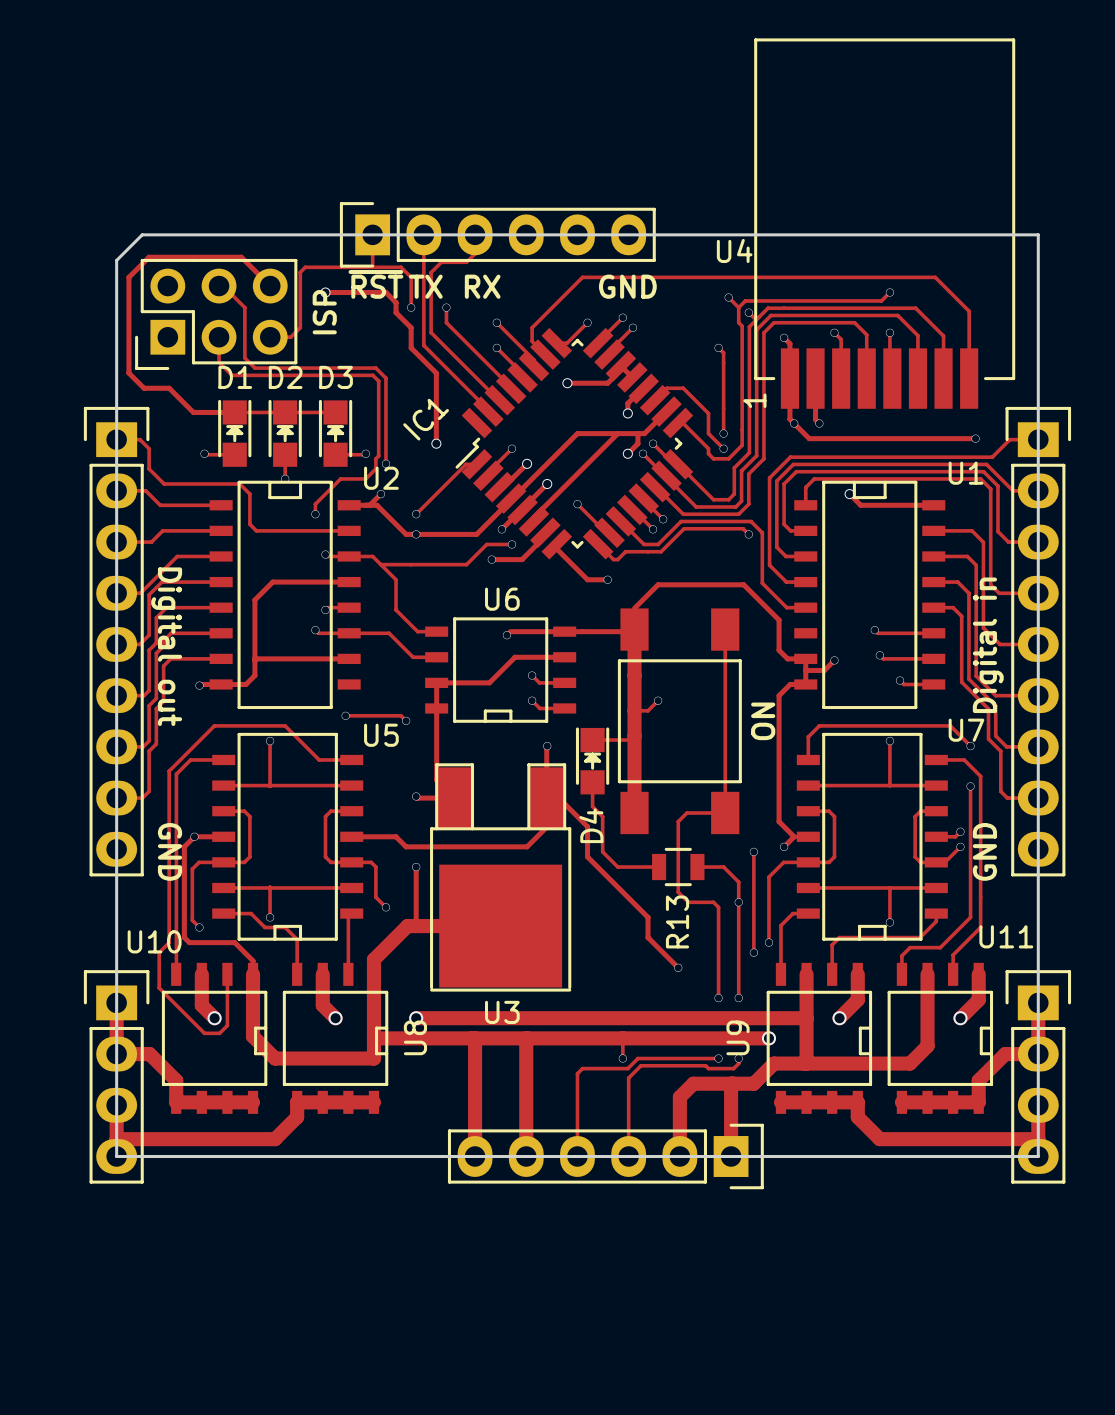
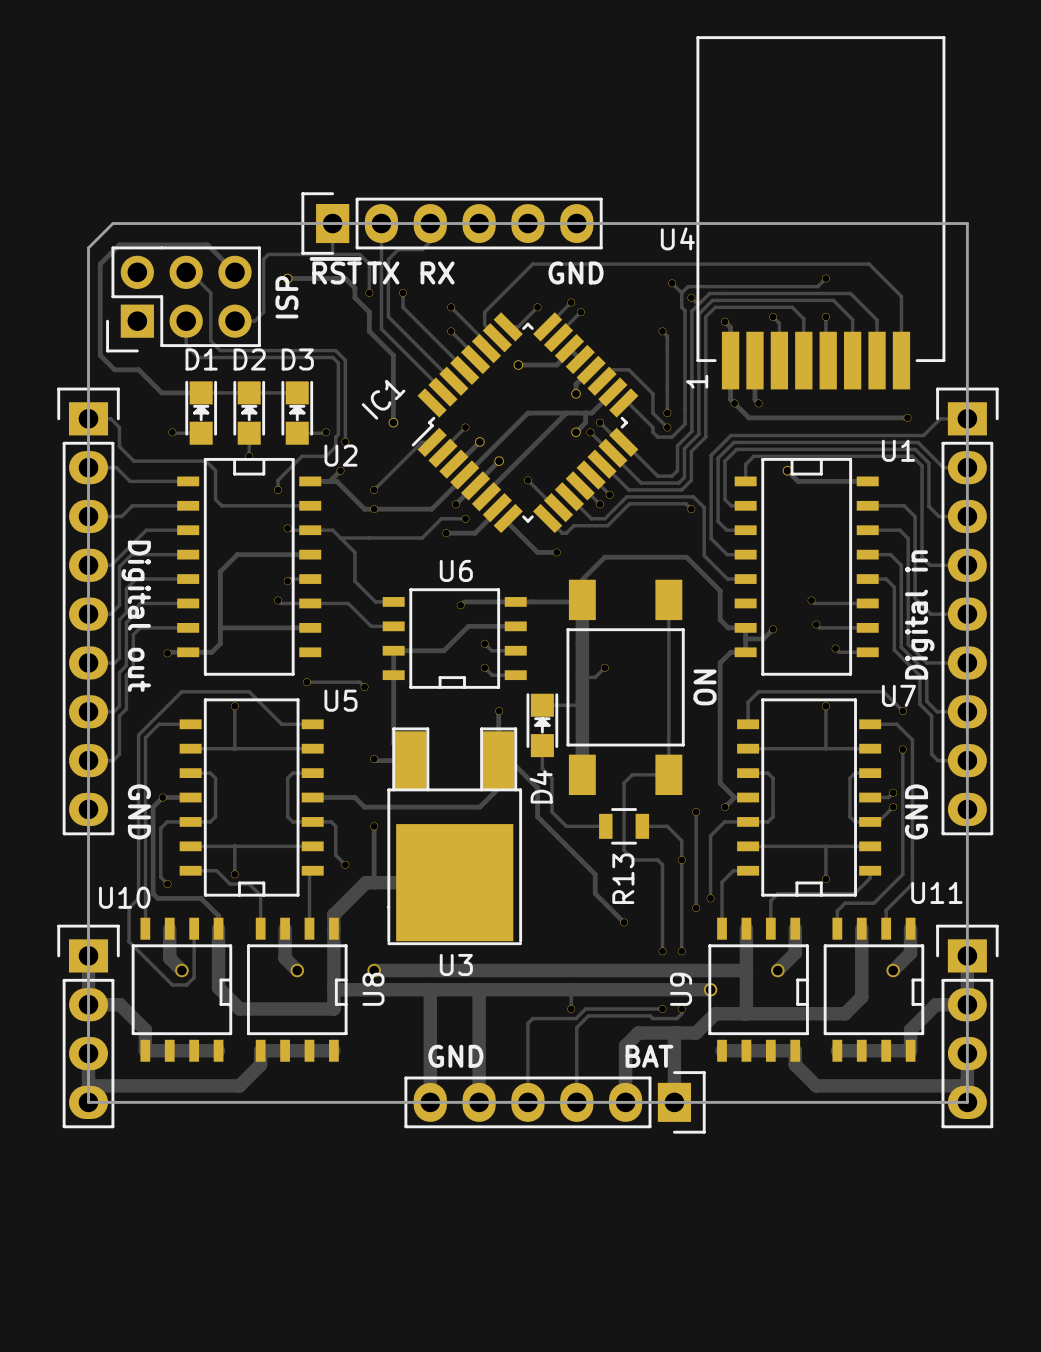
text: none -> GND (455, 1056)
text: none -> BAT (649, 1056)

